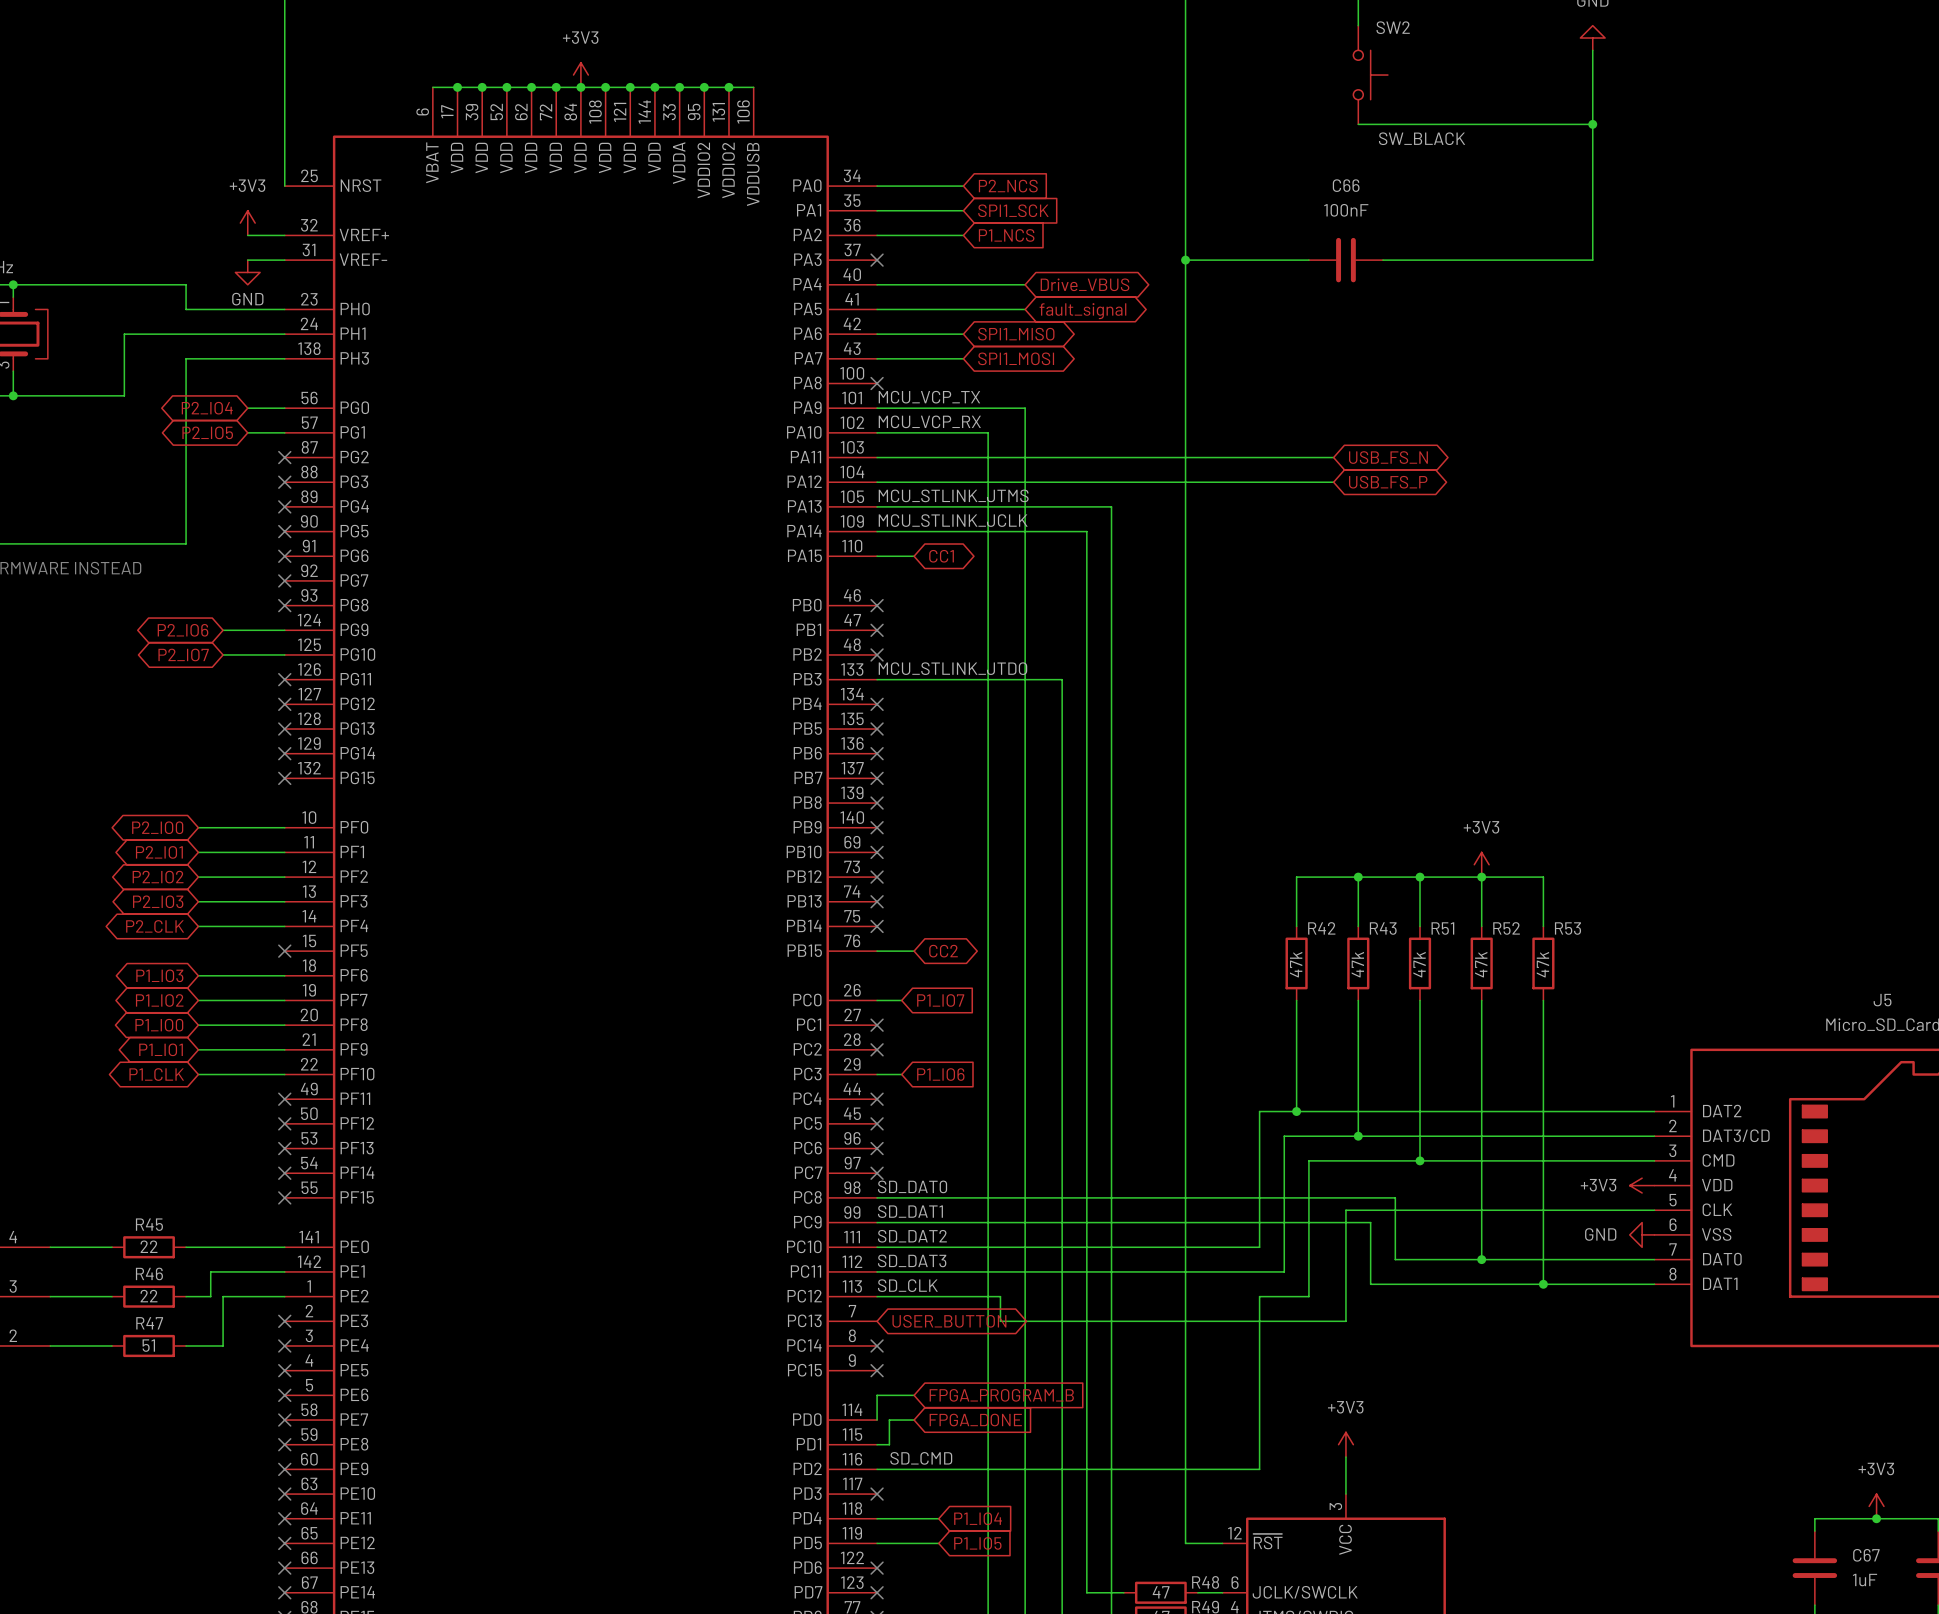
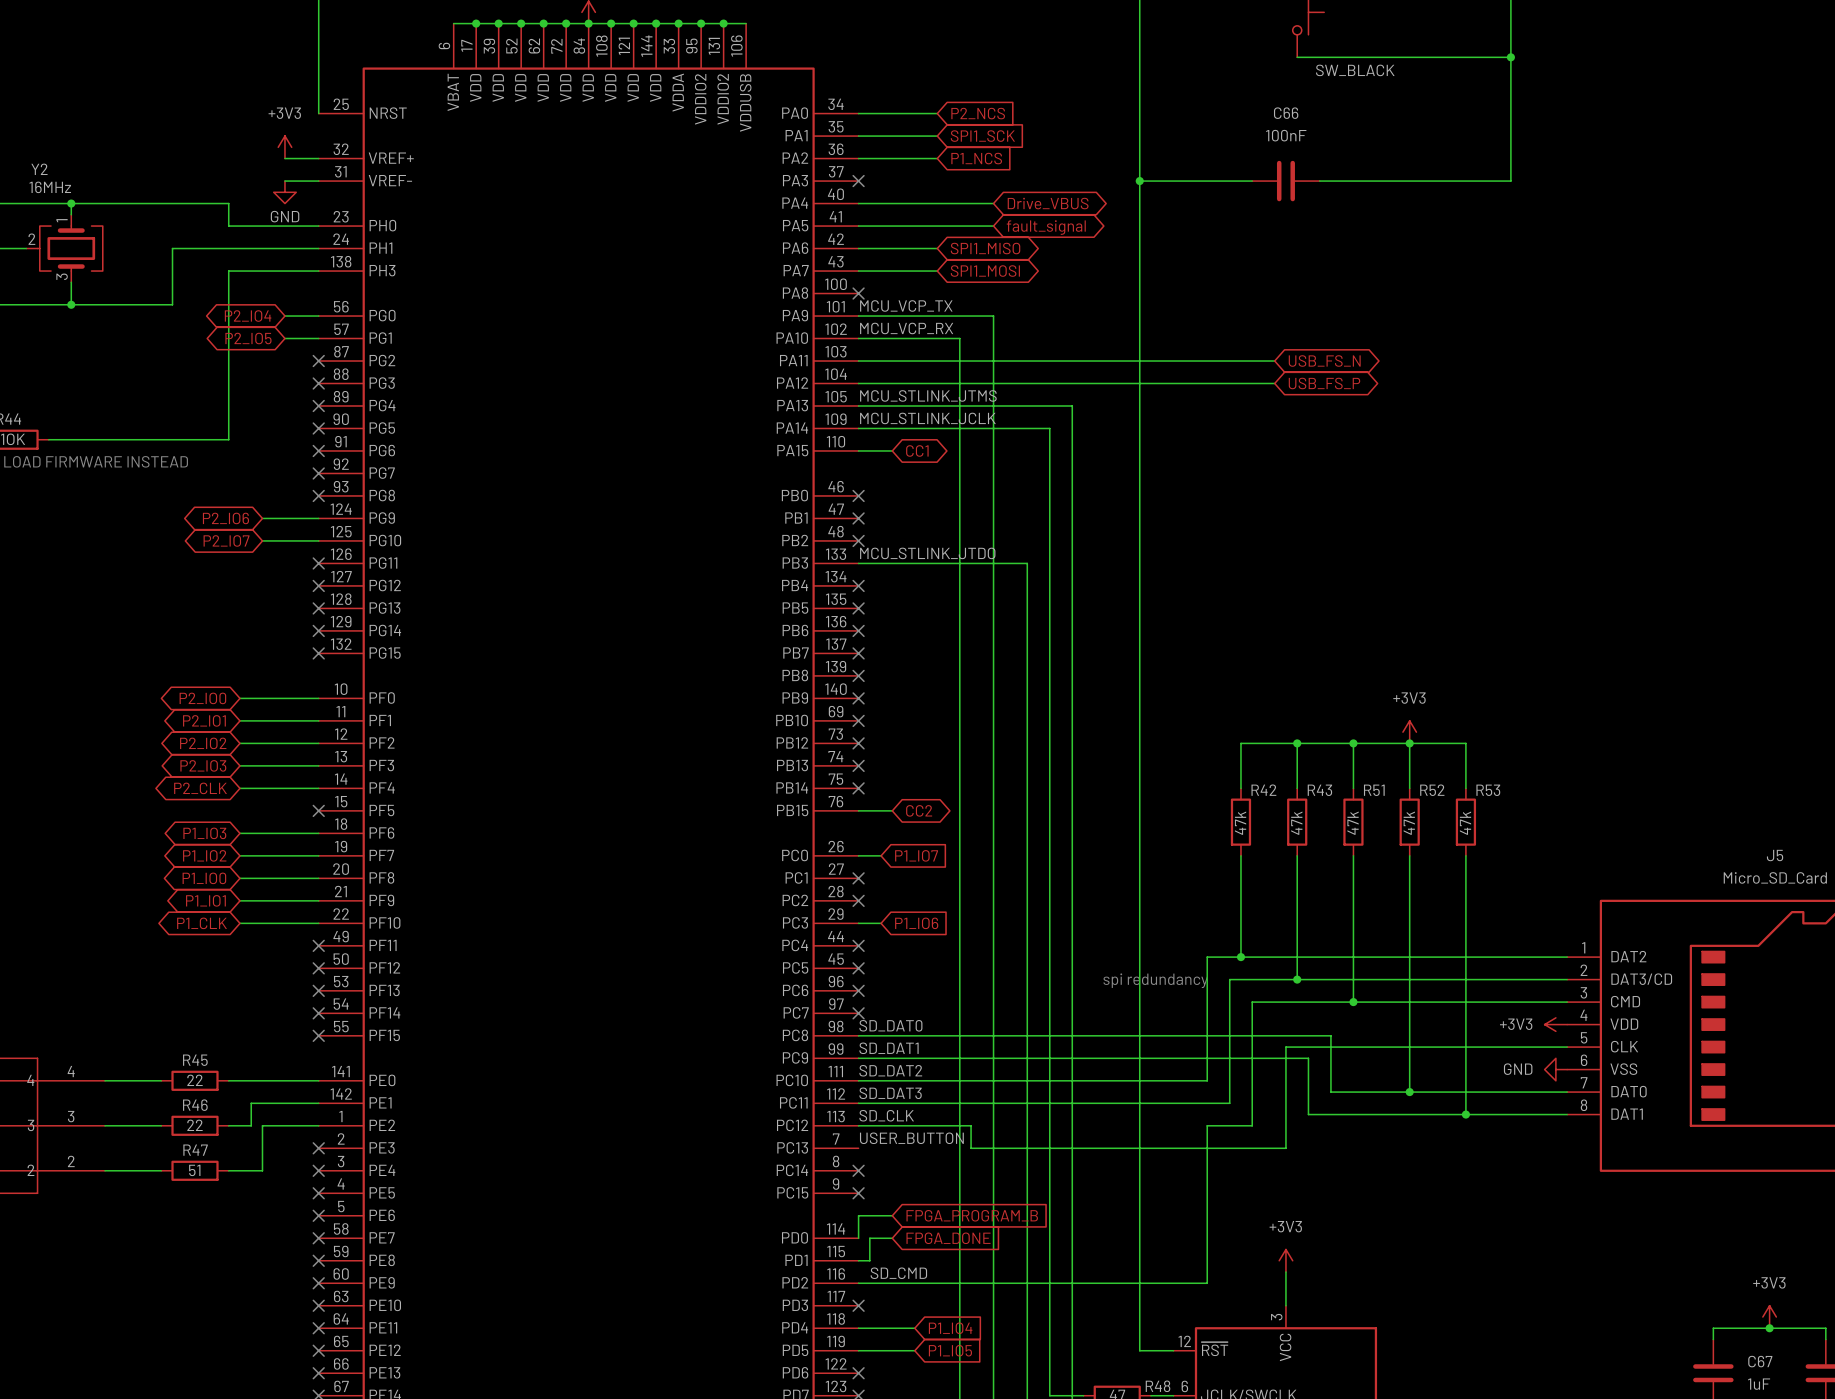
text: none -> spi redundancy (1155, 980)
label: none -> USER_BUTTON (911, 1138)
global label: USER_BUTTON (949, 1321) -> none

